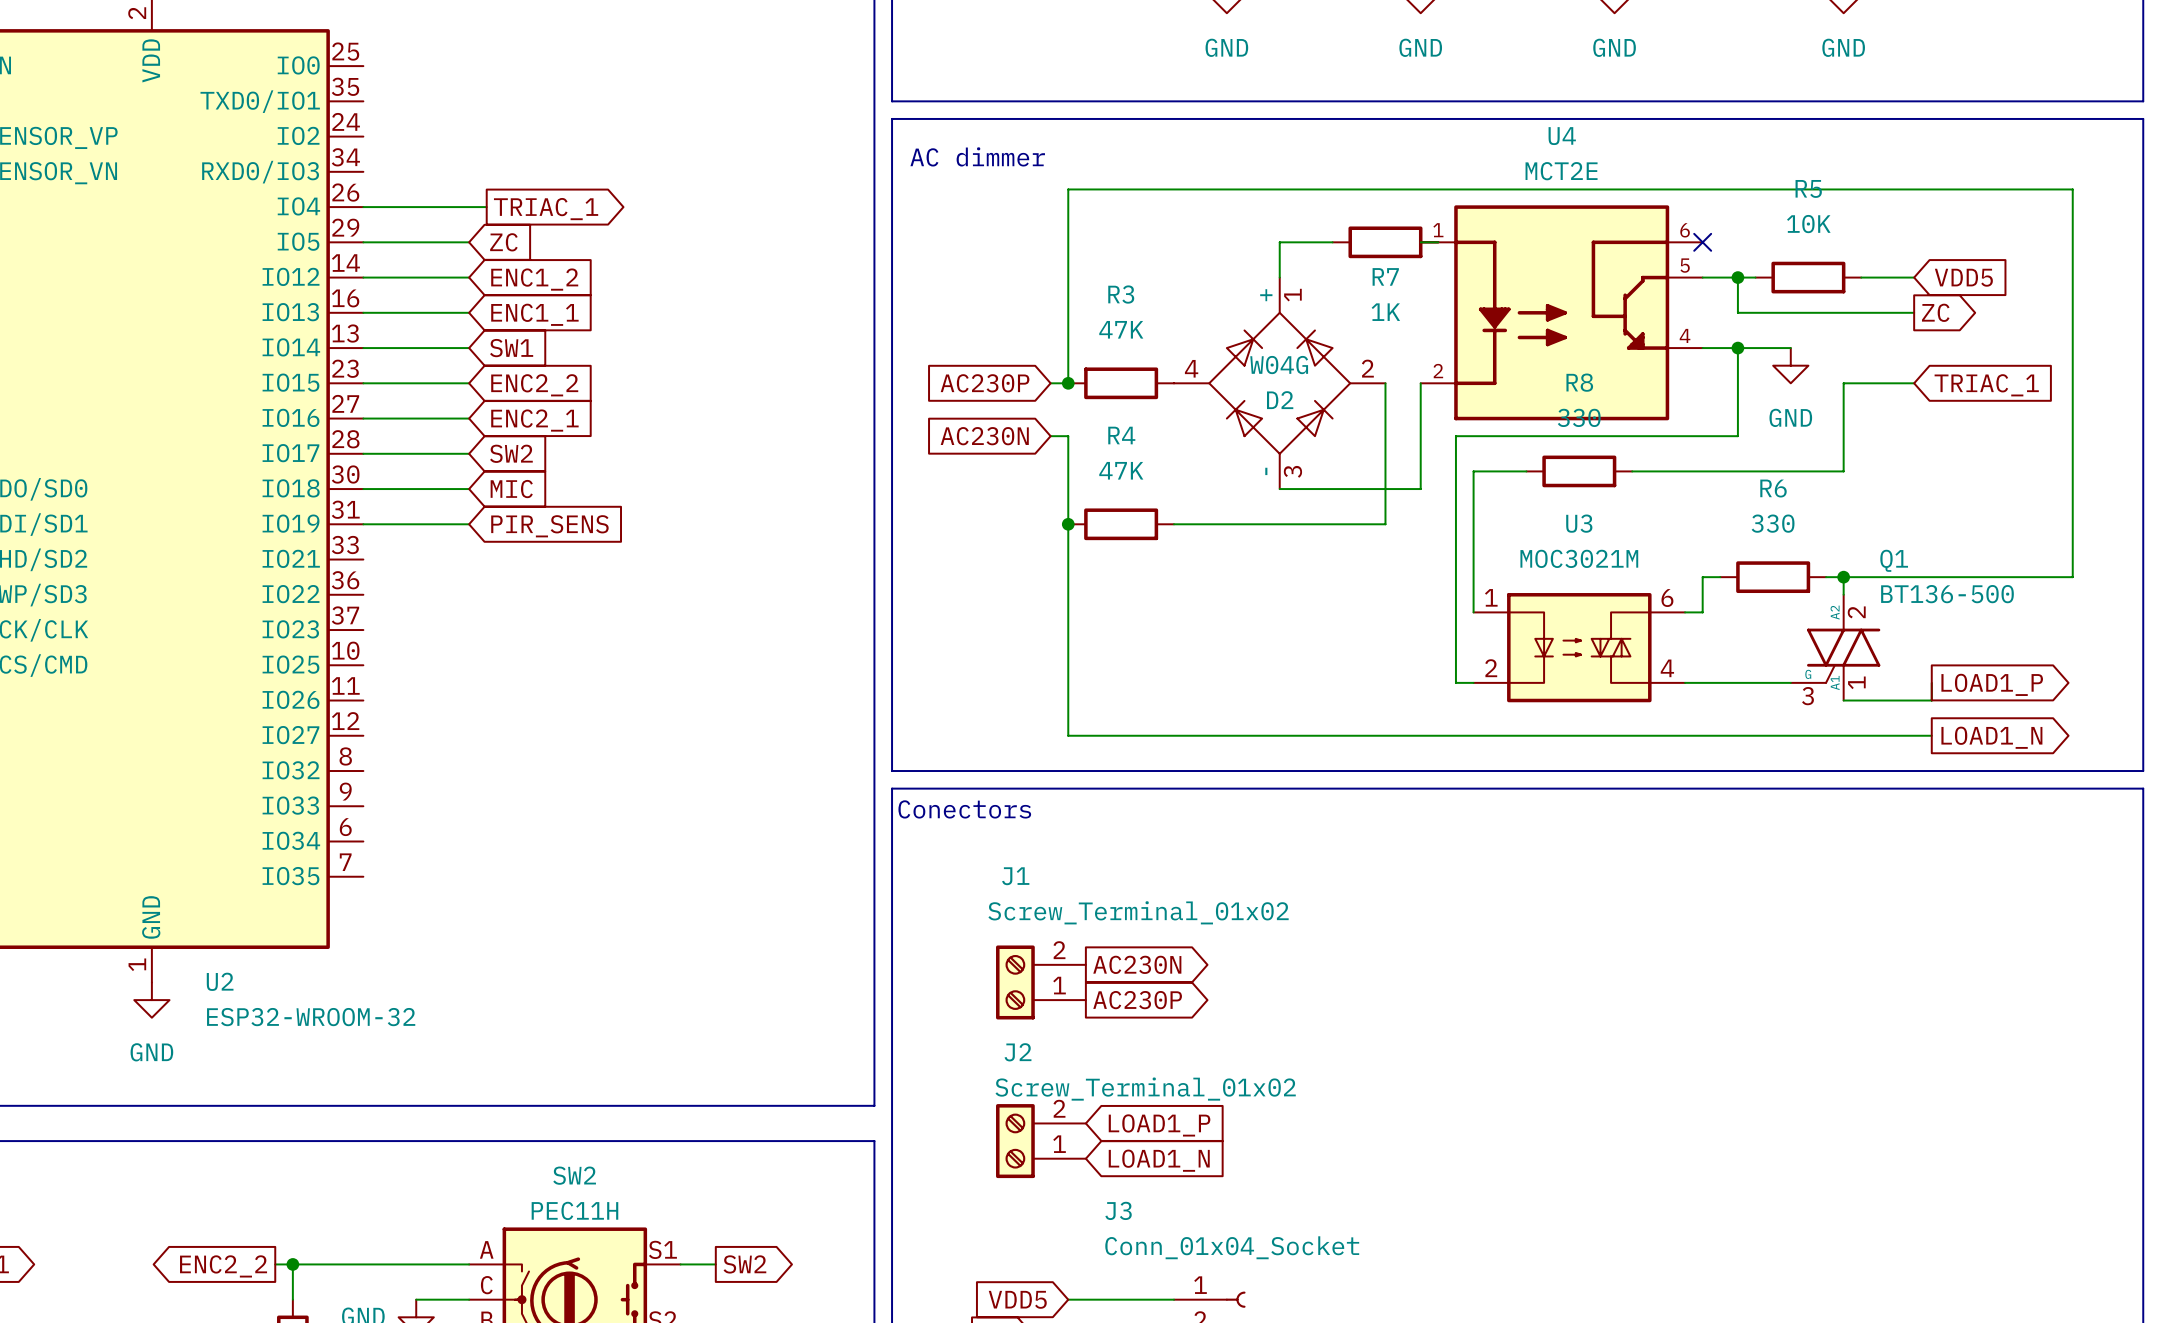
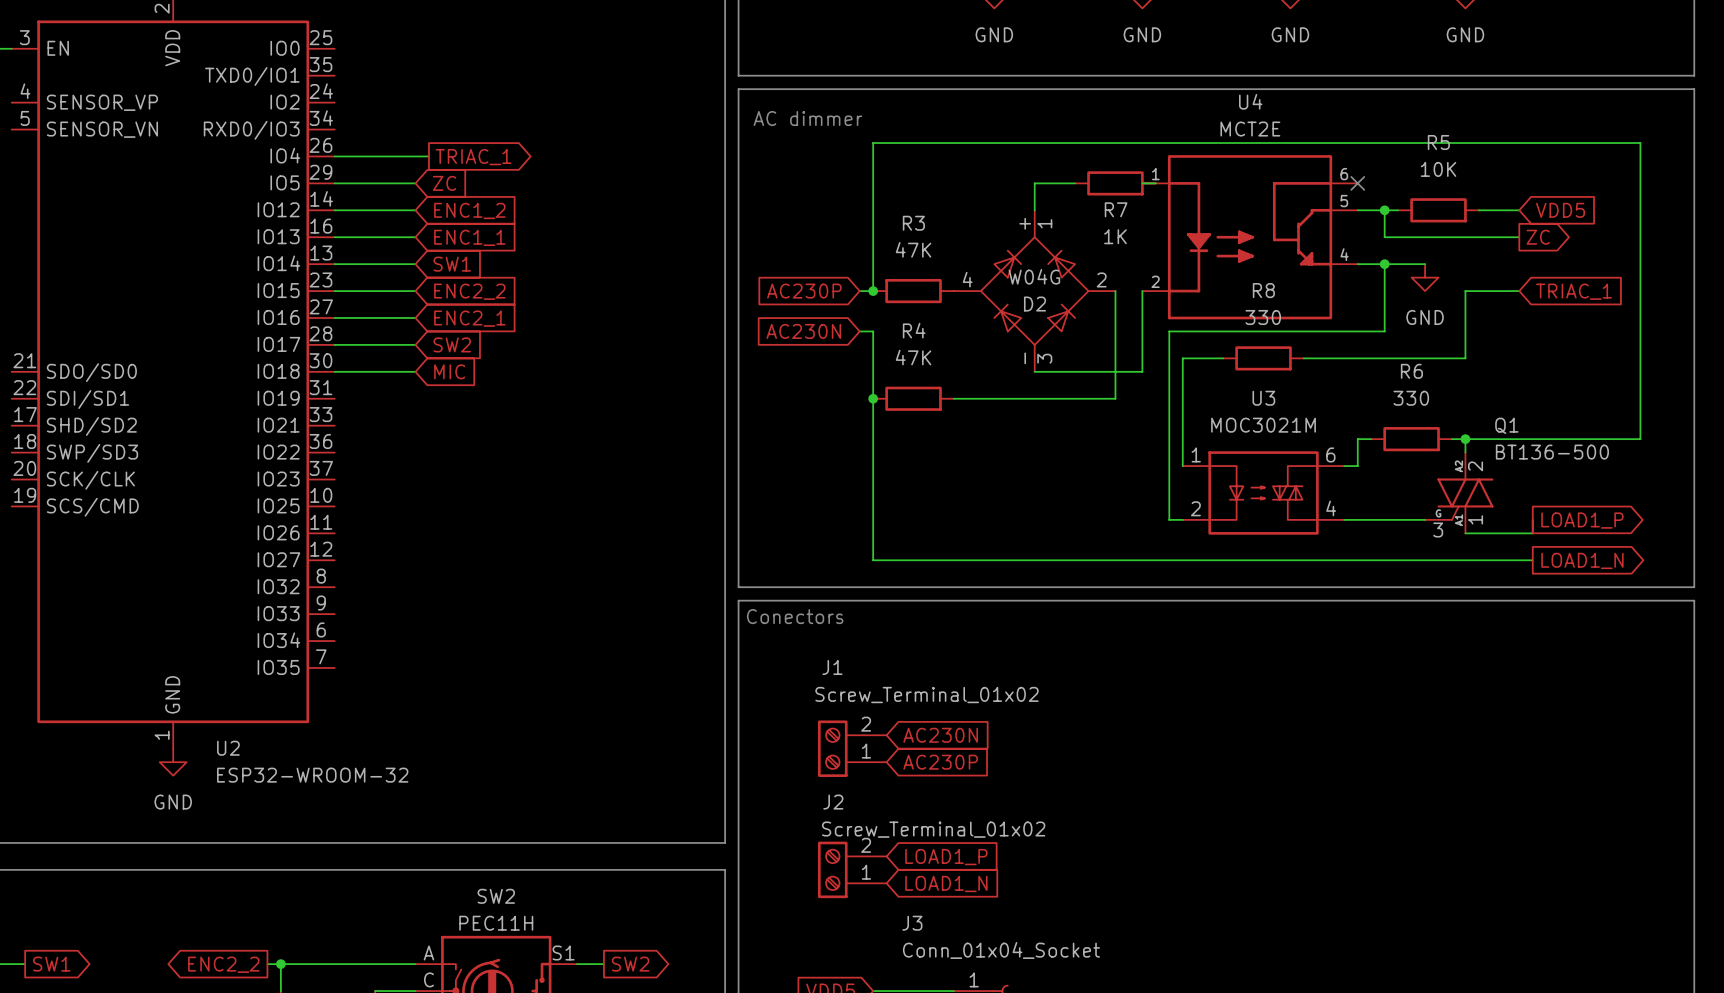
wire: (363, 524) (469, 524) -> none
global label: PIR_SENS (549, 526) -> none
global label shape: output (1137, 964) -> input (940, 735)
global label shape: output (1137, 1000) -> input (940, 762)

